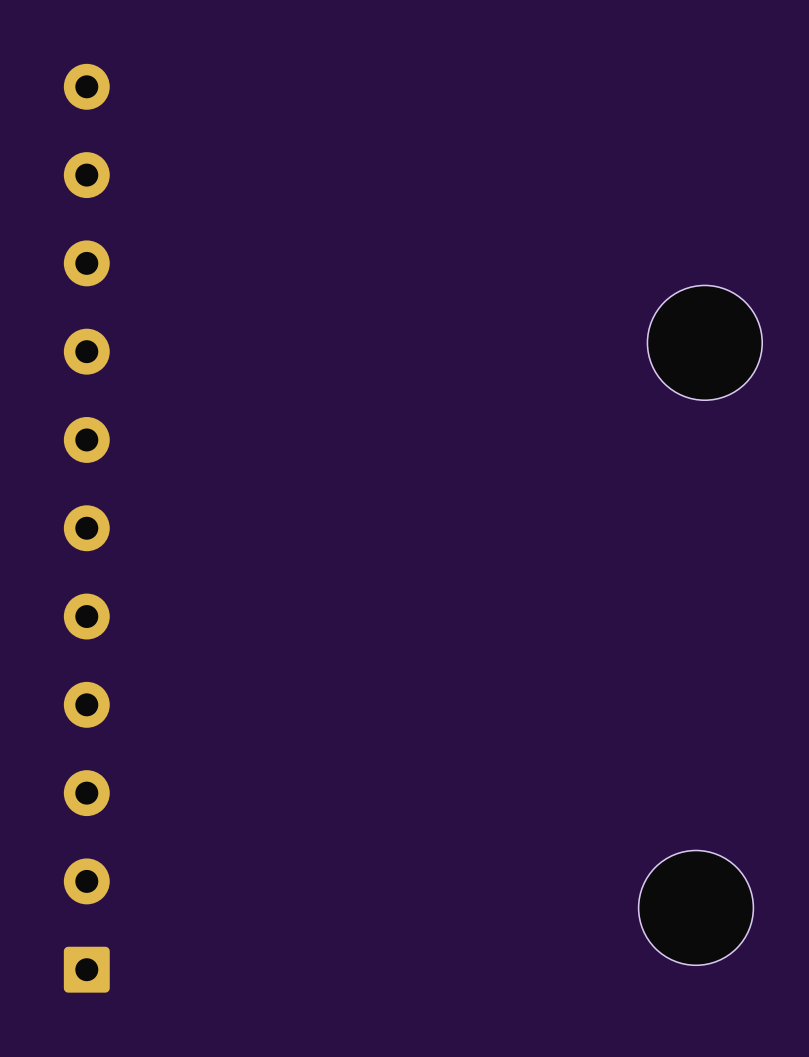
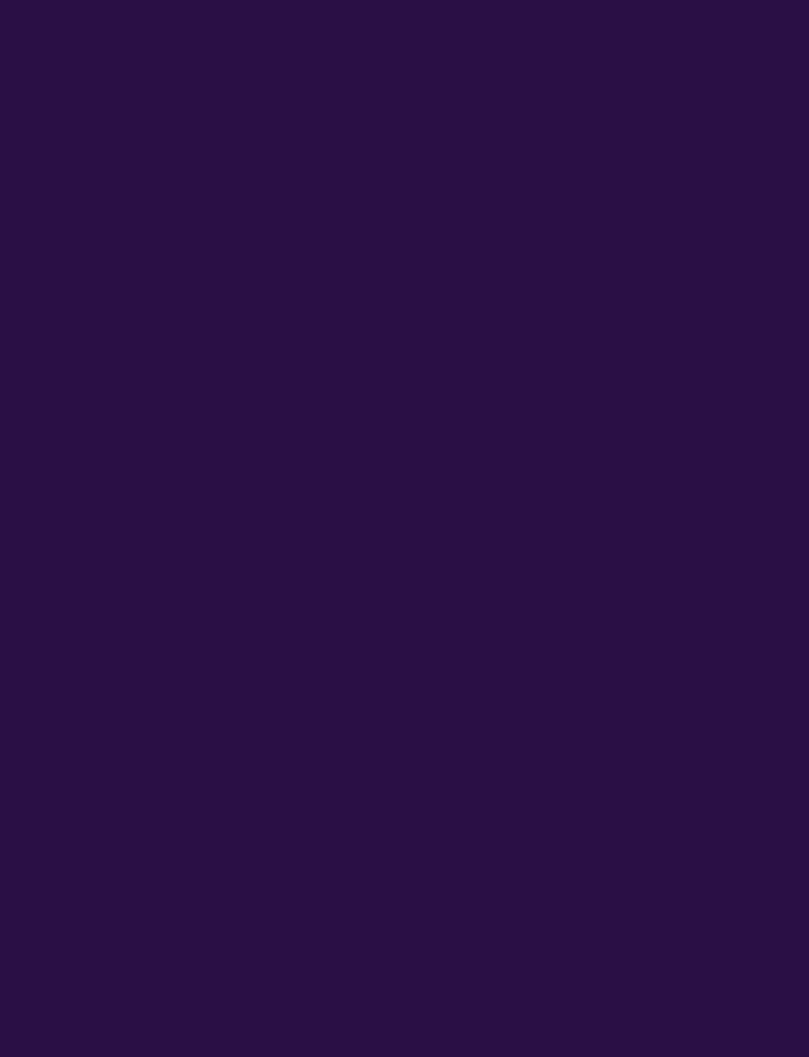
part: (704, 342) -> none
part: (86, 528) -> none
part: (696, 907) -> none

